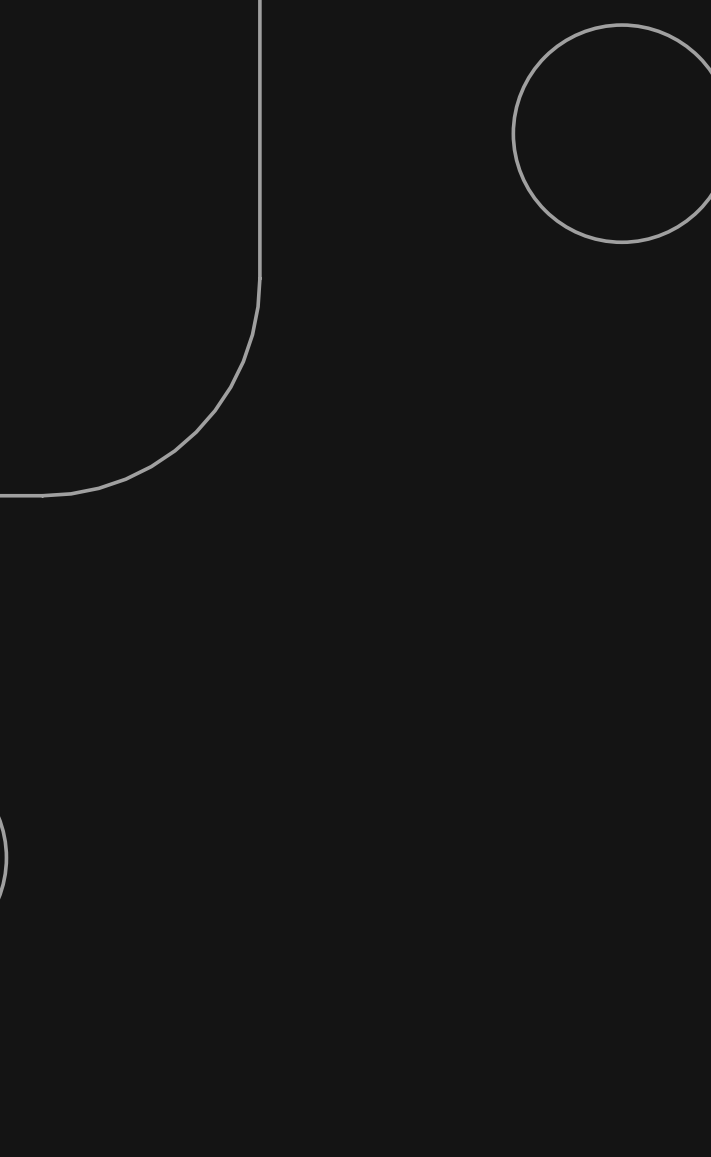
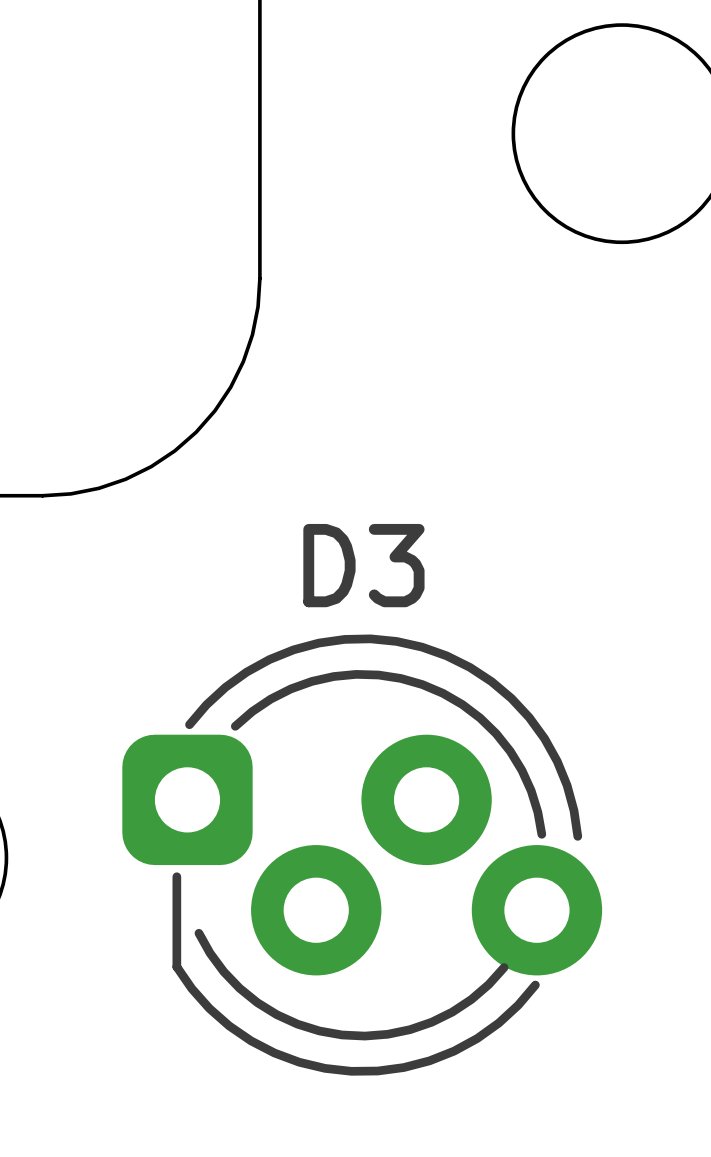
D3: none -> (362, 855)

